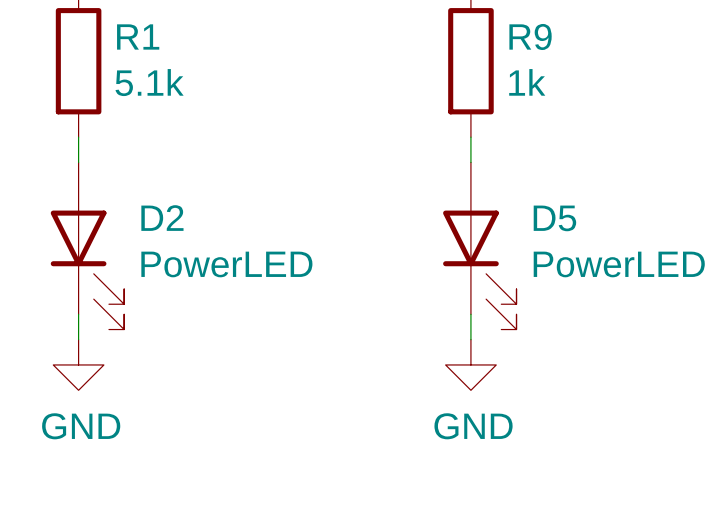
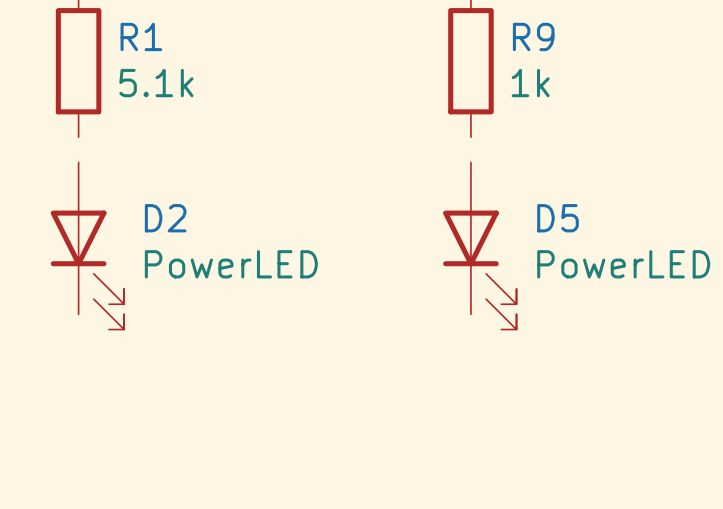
wire: (78, 137) (78, 162) -> none
wire: (470, 137) (470, 162) -> none
wire: (78, 314) (78, 339) -> none
wire: (470, 314) (470, 339) -> none
power symbol: GND (78, 364) -> none
power symbol: GND (470, 364) -> none

